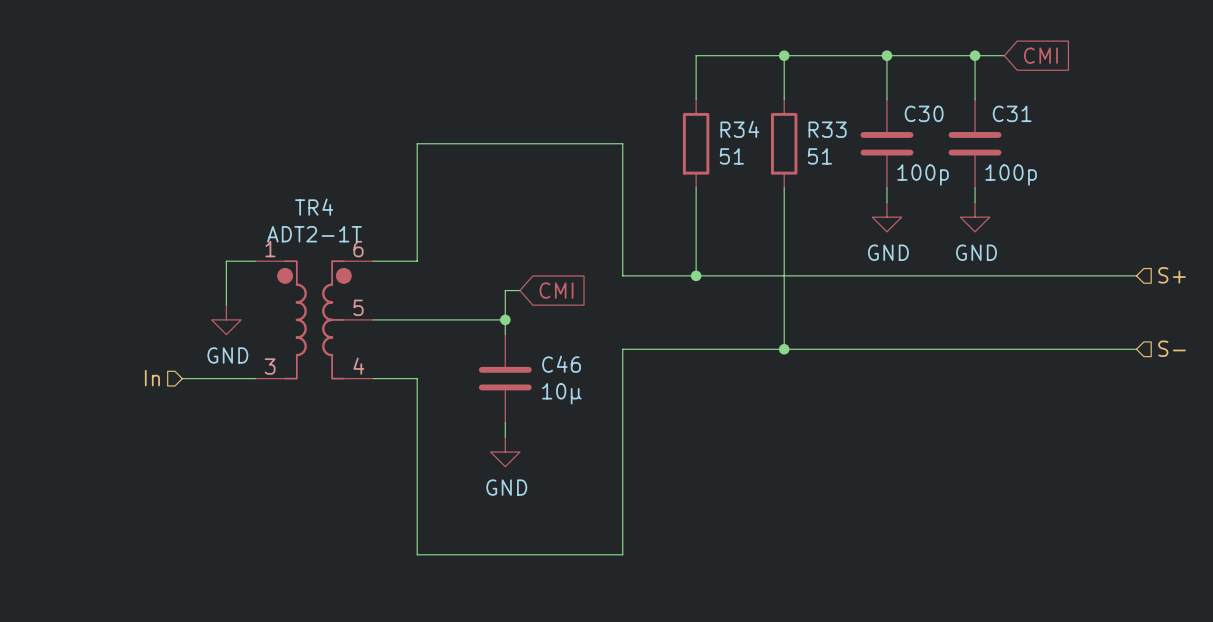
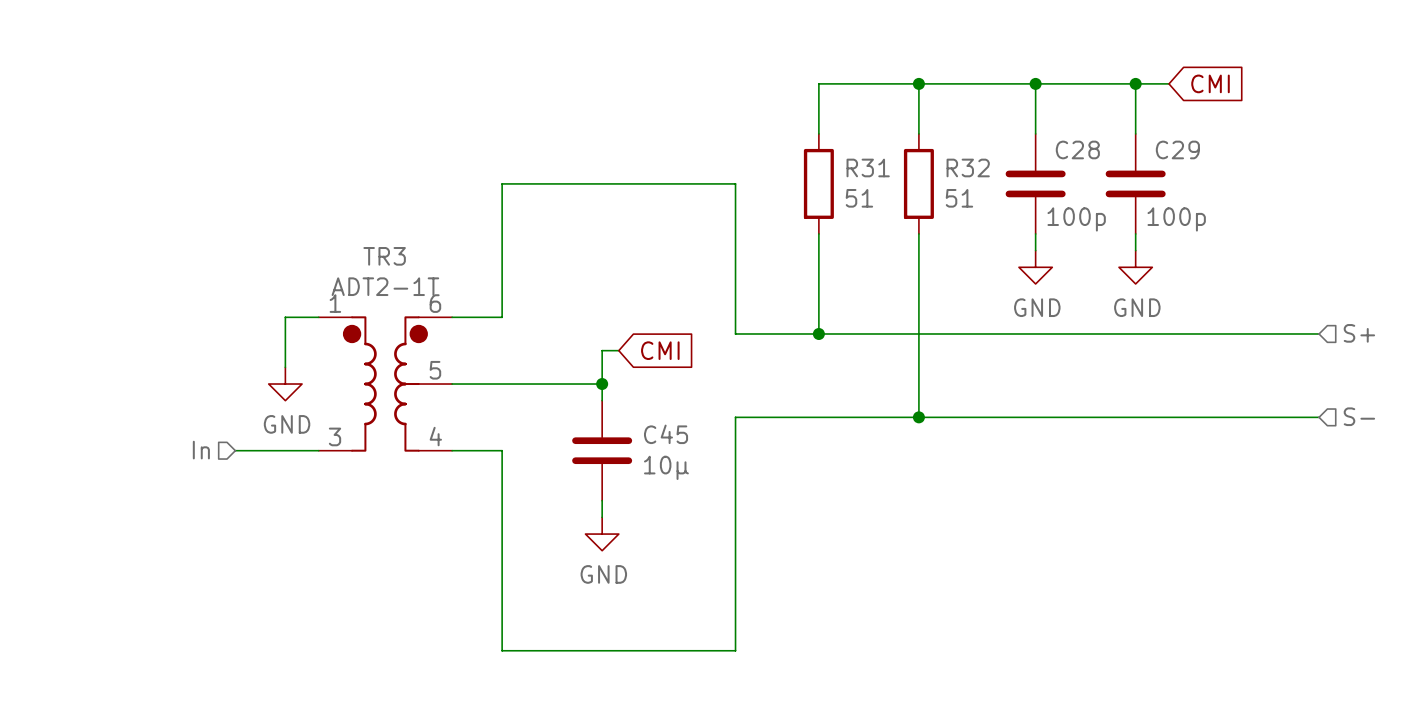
C30 name: C30 (924, 113) -> C28 (1077, 149)
C31 name: C31 (1012, 113) -> C29 (1177, 149)
R34 name: R34 (739, 129) -> R31 (868, 167)
R33 name: R33 (827, 129) -> R32 (968, 167)
TR4 name: TR4 (314, 207) -> TR3 (384, 256)
C46 name: C46 (561, 364) -> C45 (666, 434)

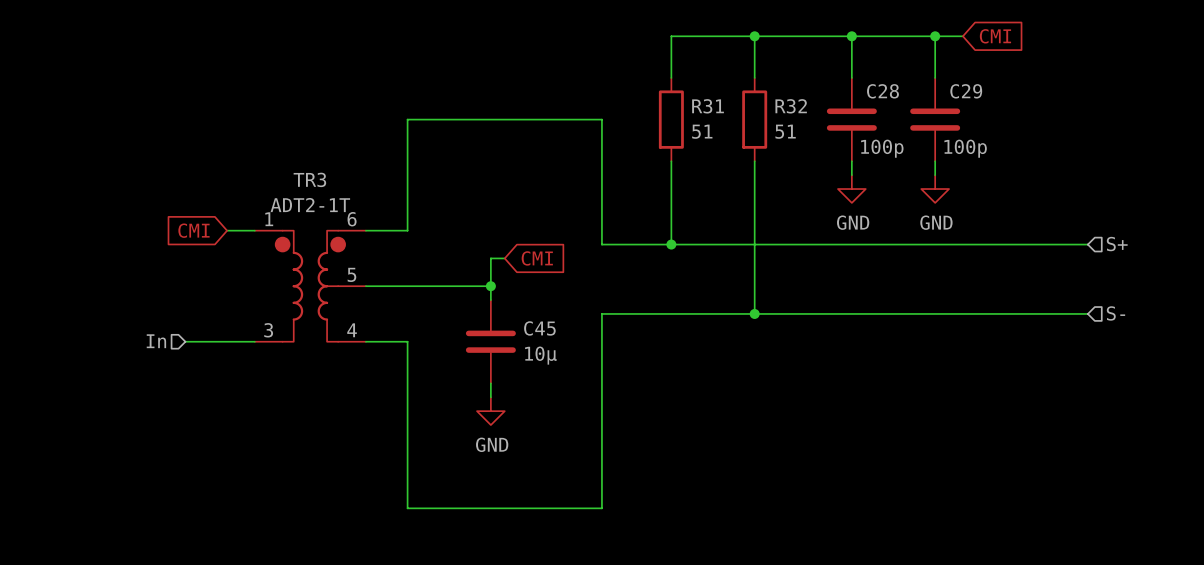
global label: none -> CMI (193, 230)
wire: (285, 317) (285, 367) -> none
power symbol: GND (285, 384) -> none

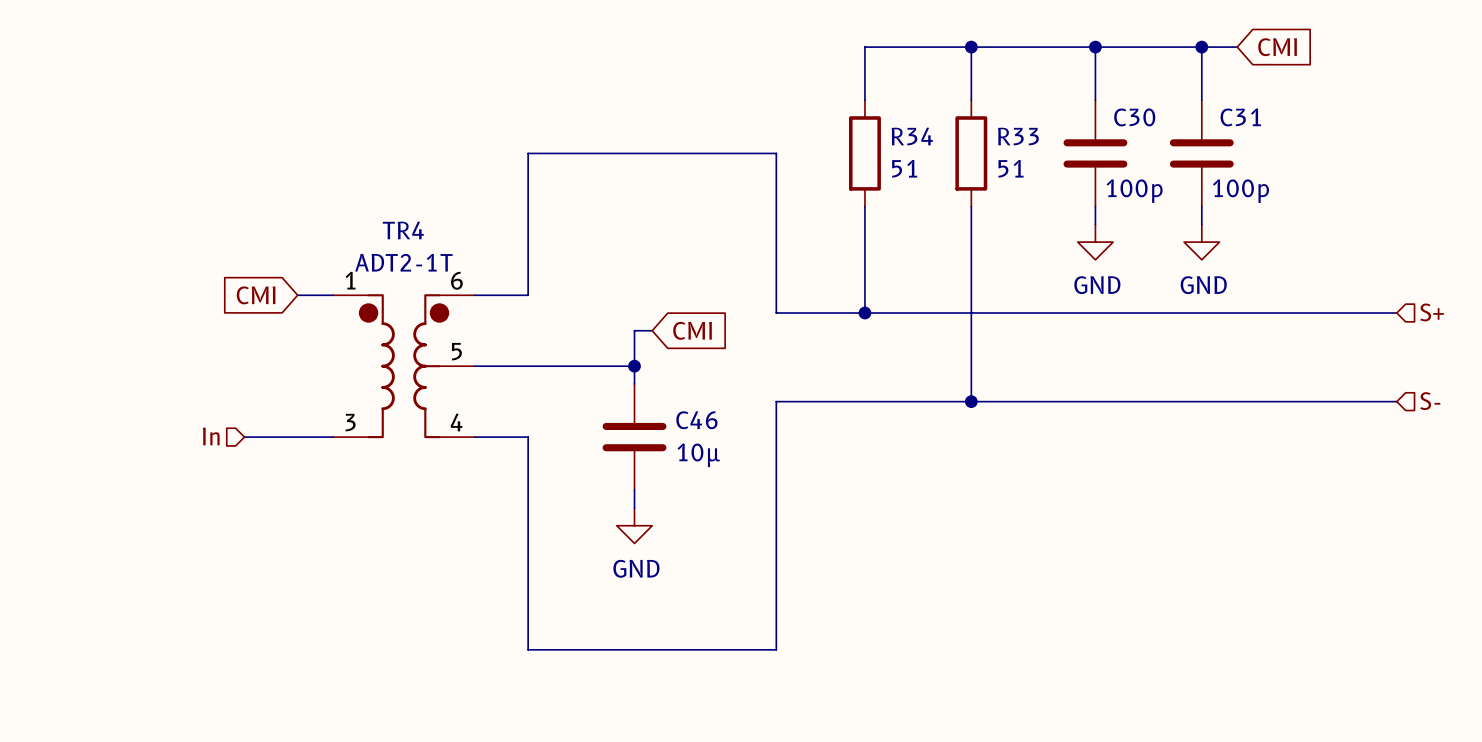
C28 name: C28 (882, 91) -> C30 (1134, 117)
C29 name: C29 (966, 91) -> C31 (1240, 117)
R31 name: R31 (708, 106) -> R34 (912, 136)
R32 name: R32 (791, 106) -> R33 (1018, 136)
TR3 name: TR3 (309, 179) -> TR4 (403, 230)
C45 name: C45 (539, 328) -> C46 (696, 420)

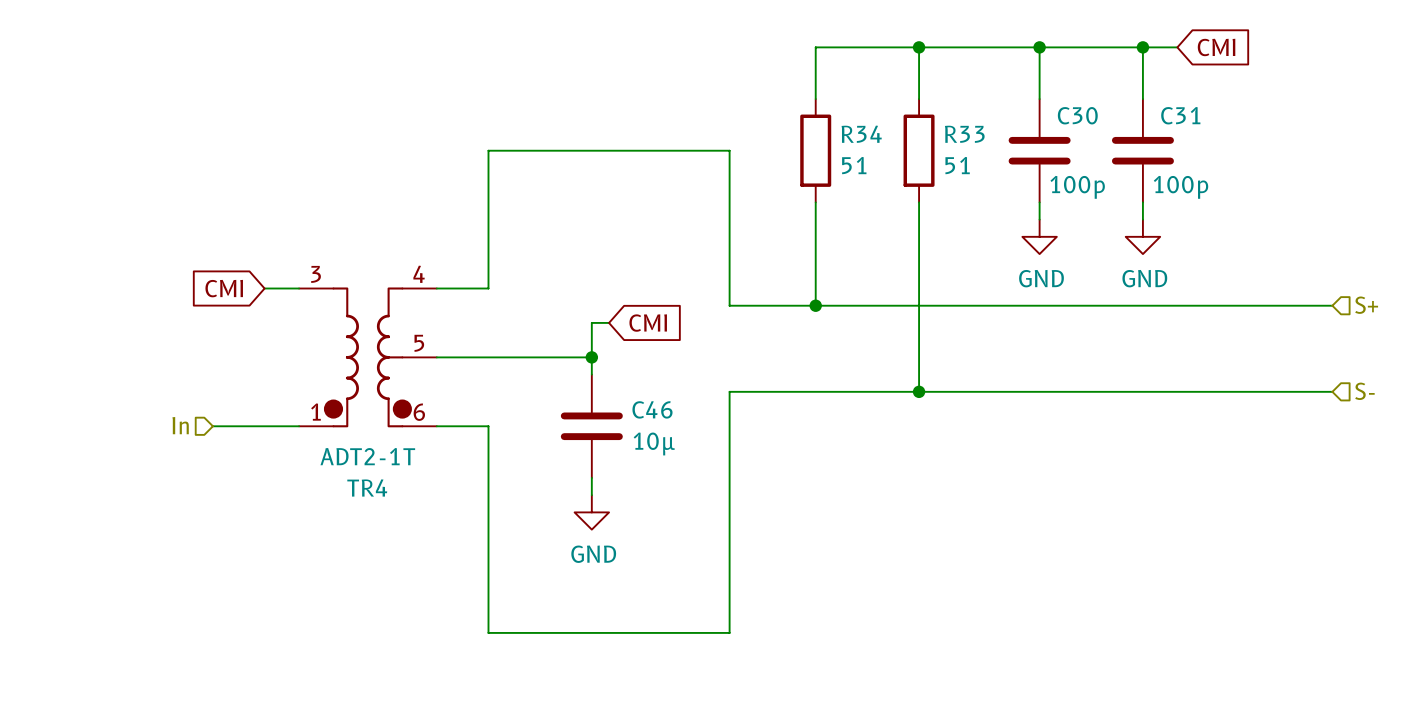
TR4 flip: as is (404, 366) -> up-down (367, 357)

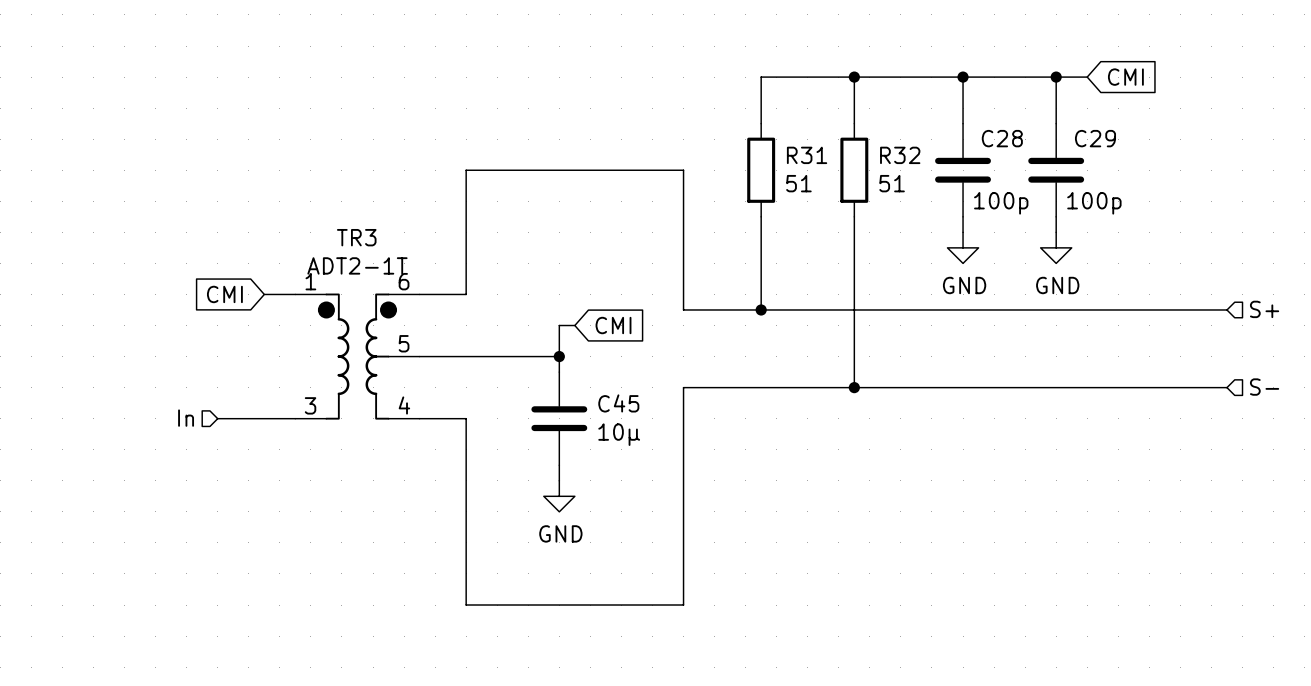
C30 name: C30 (1077, 115) -> C28 (1002, 138)
C31 name: C31 (1180, 115) -> C29 (1095, 138)
R34 name: R34 (861, 134) -> R31 (807, 155)
R33 name: R33 (964, 134) -> R32 (900, 155)
TR4: ADT2-1T (367, 357) -> none
TR3: none -> ADT2-1T (357, 356)
C46 name: C46 (652, 409) -> C45 (618, 403)

